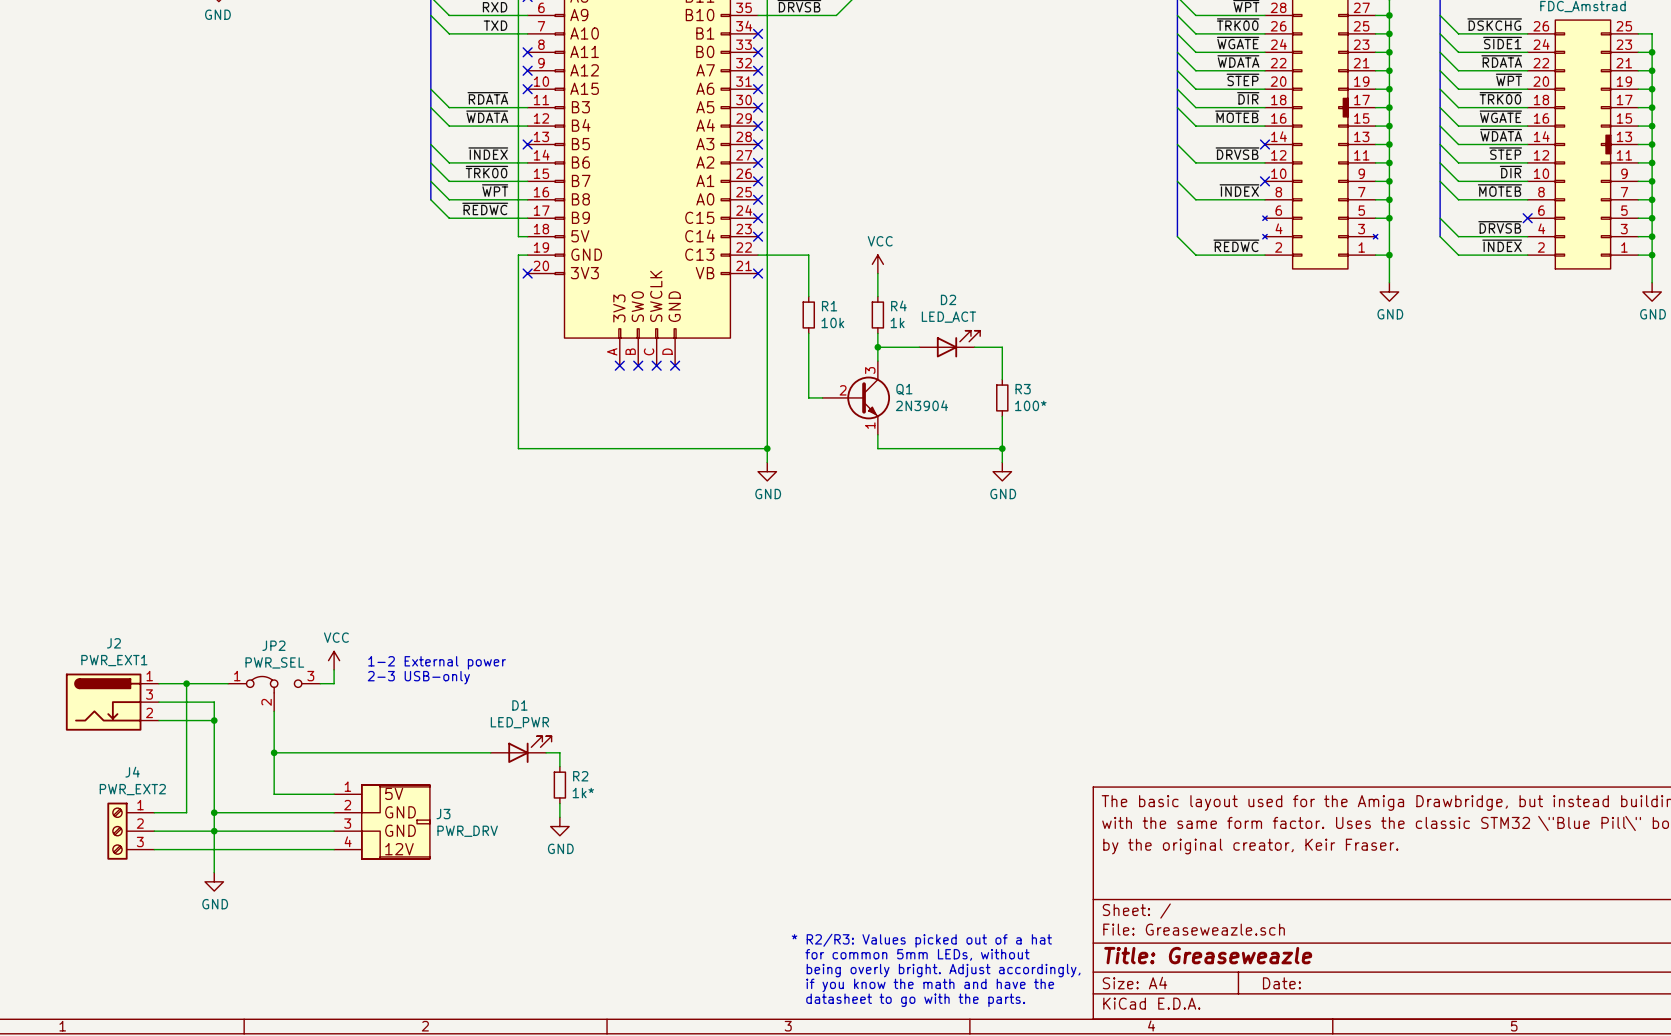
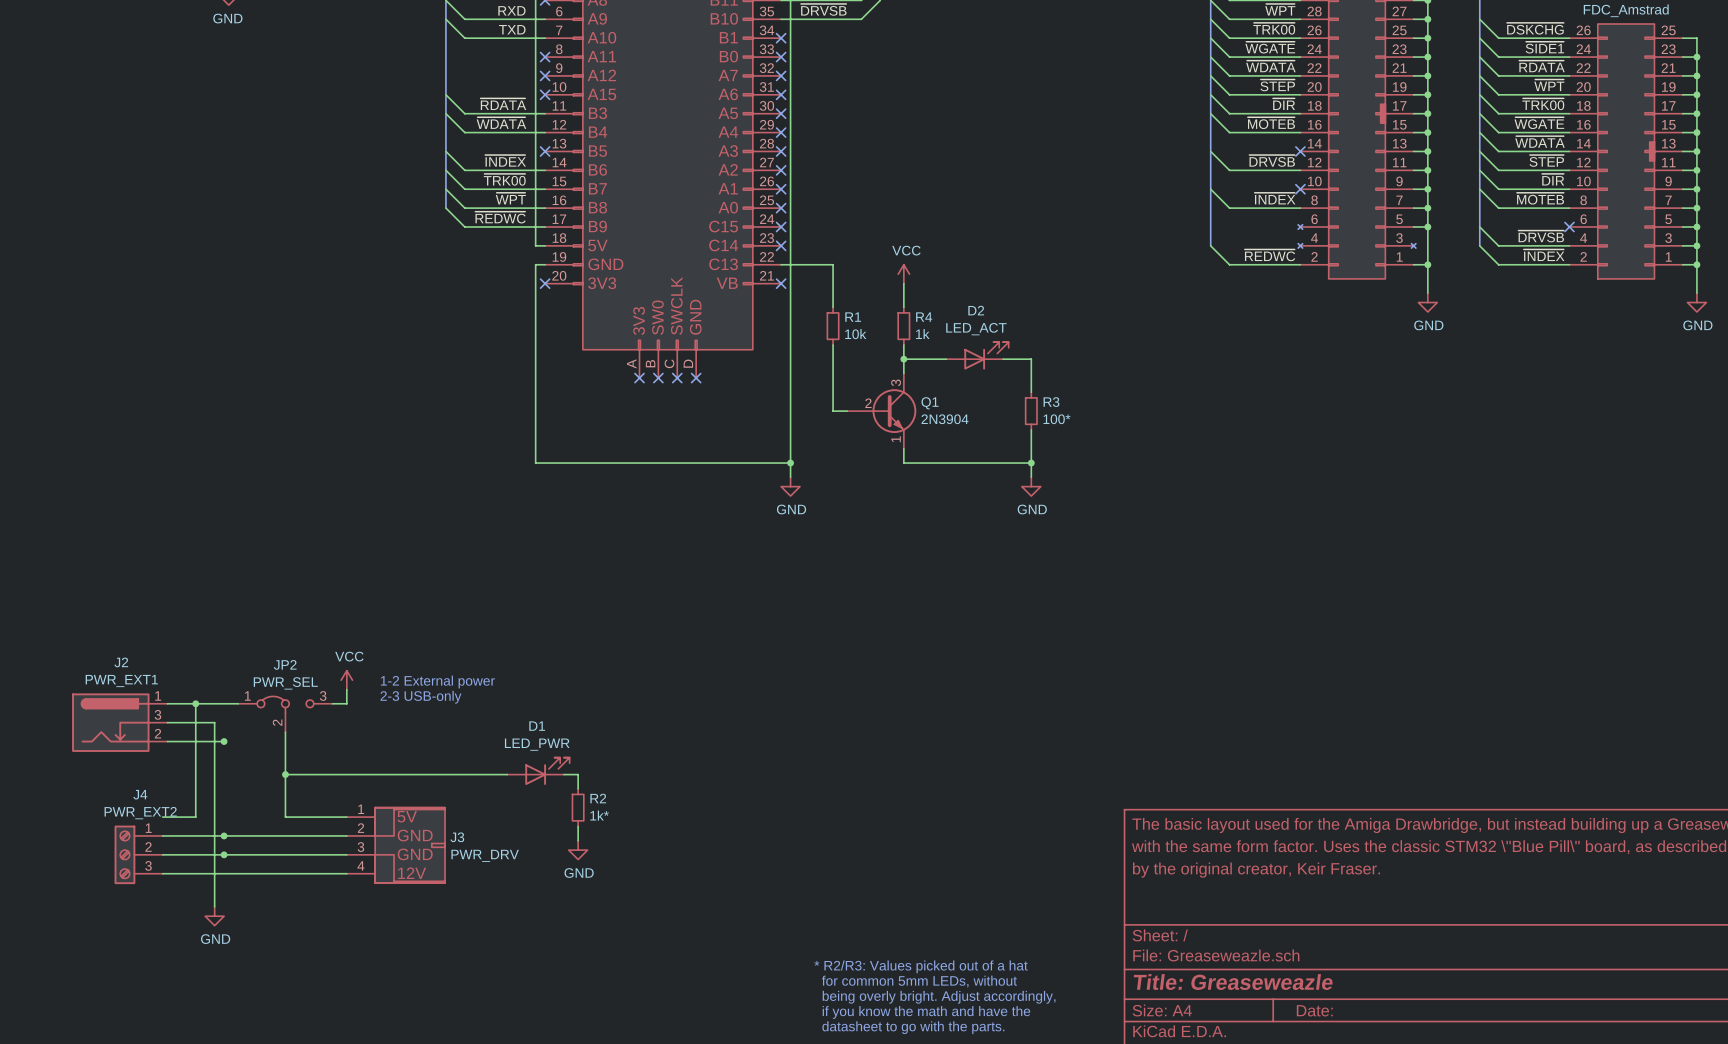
wire: (205, 702) (214, 702) (214, 872) -> (214, 722) (214, 906)
wire: none -> (162, 817) (195, 817)
wire: (186, 794) (186, 812) -> (224, 835) (195, 835)
power symbol position: GND (214, 881) -> GND (214, 916)

